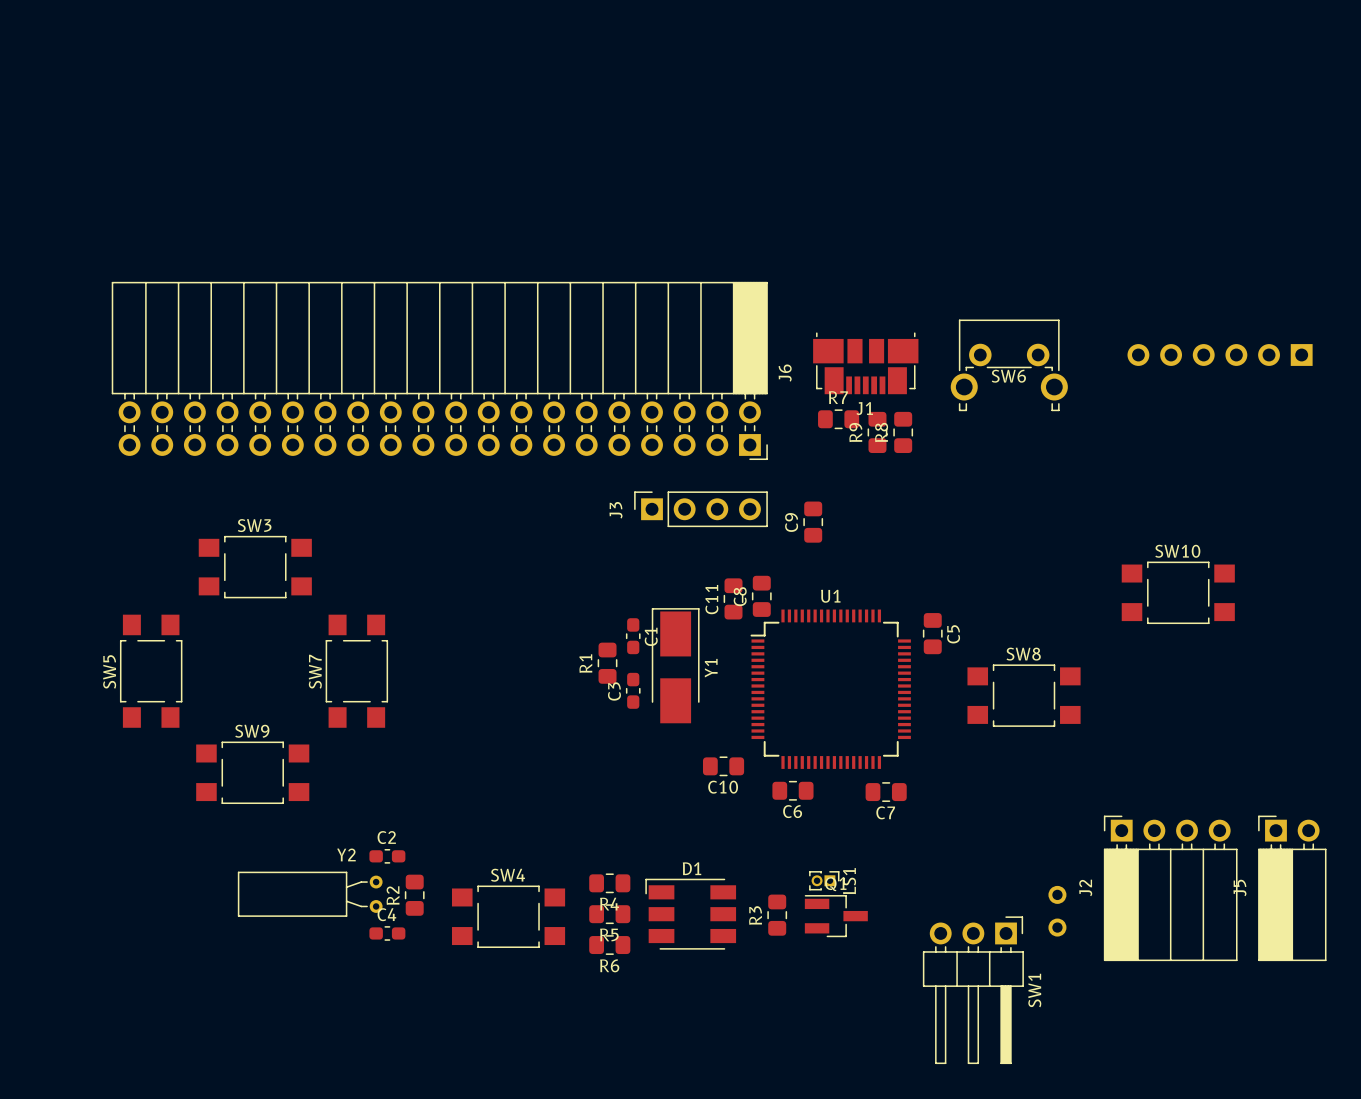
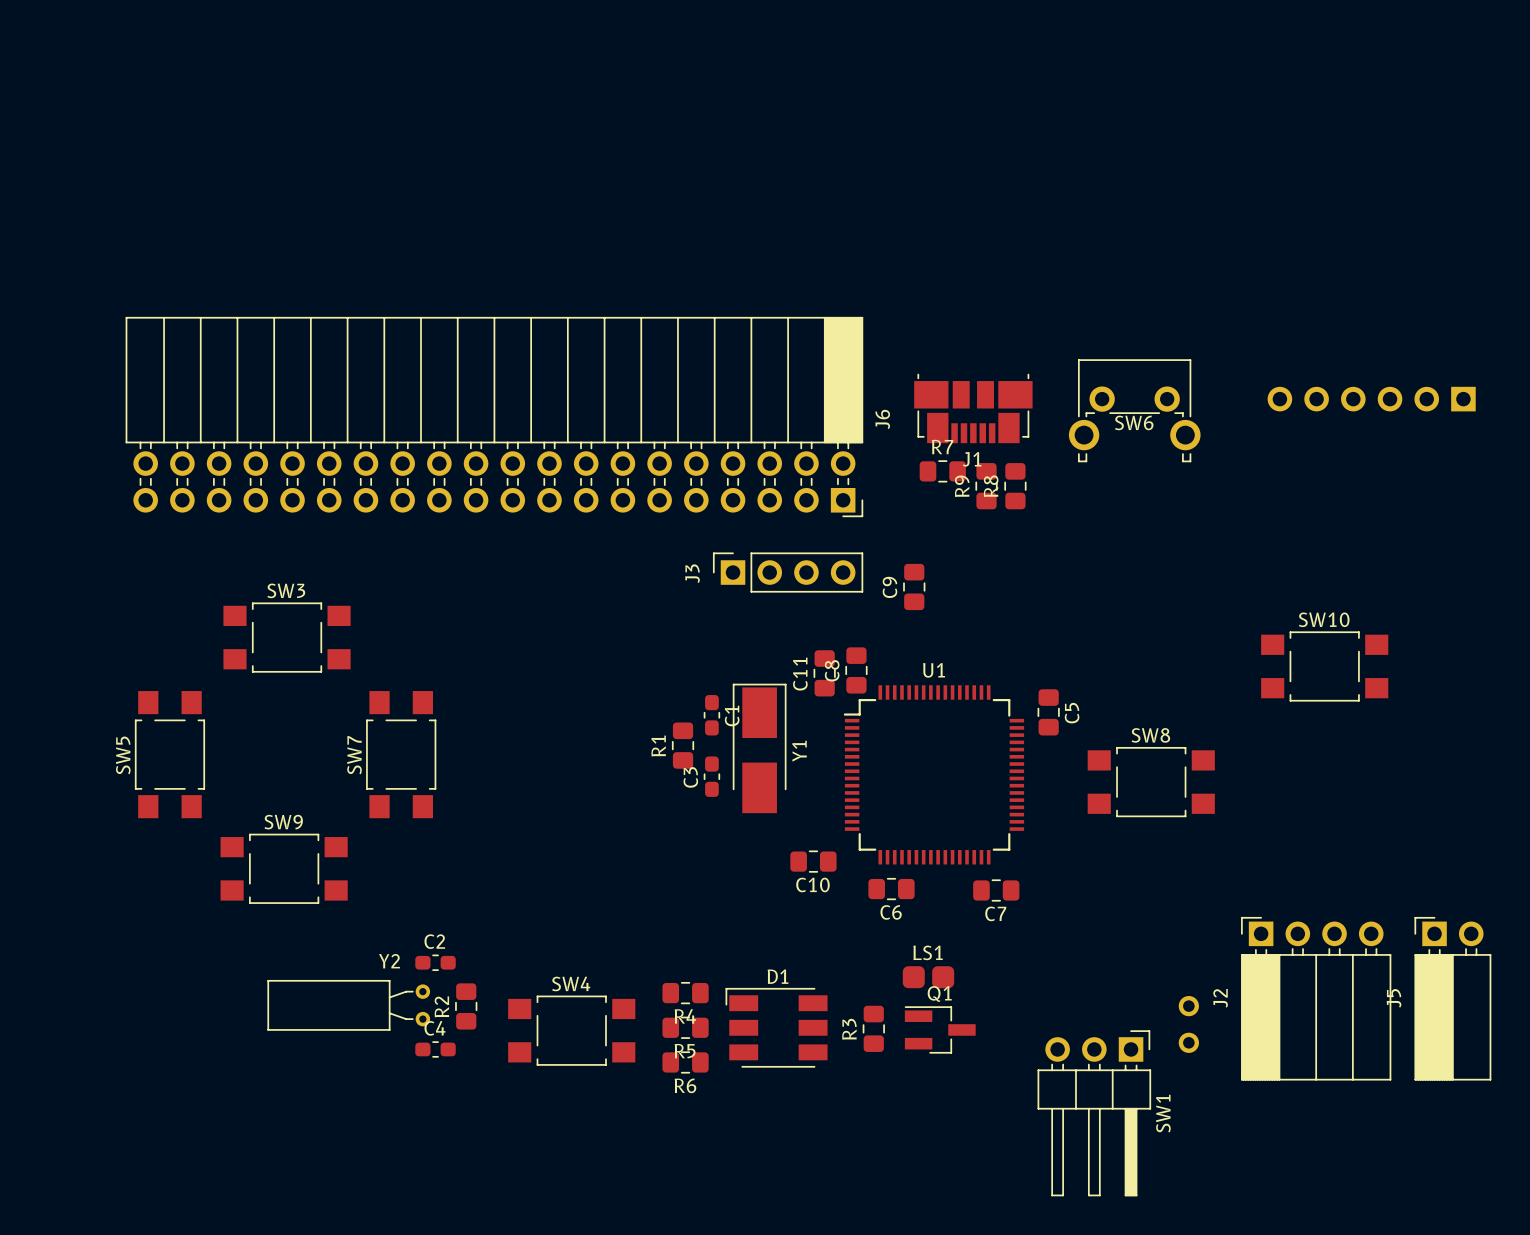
LS1 footprint: [809, 871, 840, 891] -> [902, 966, 955, 989]
LS1 name position: LS1 (849, 881) -> LS1 (928, 952)

